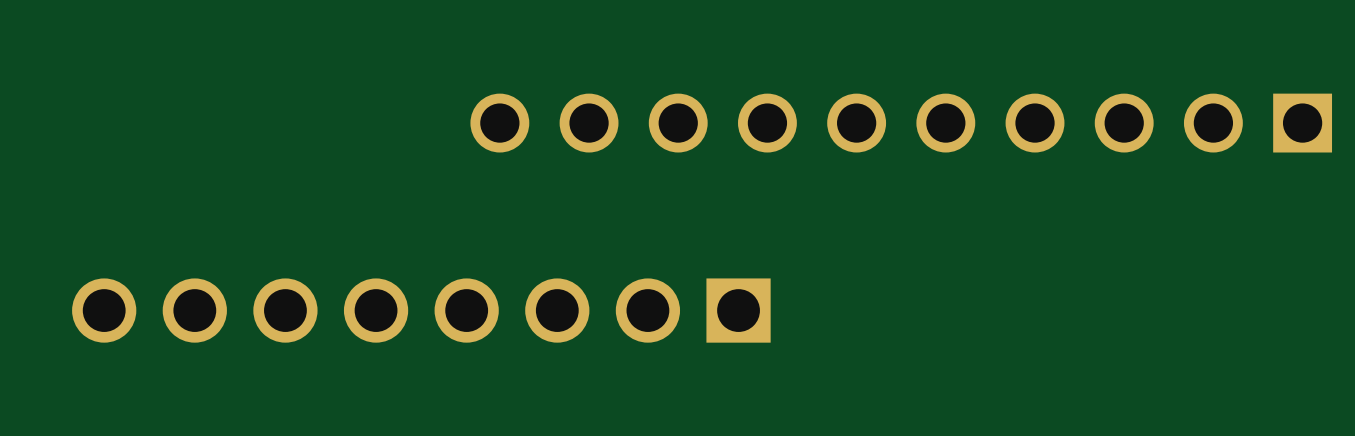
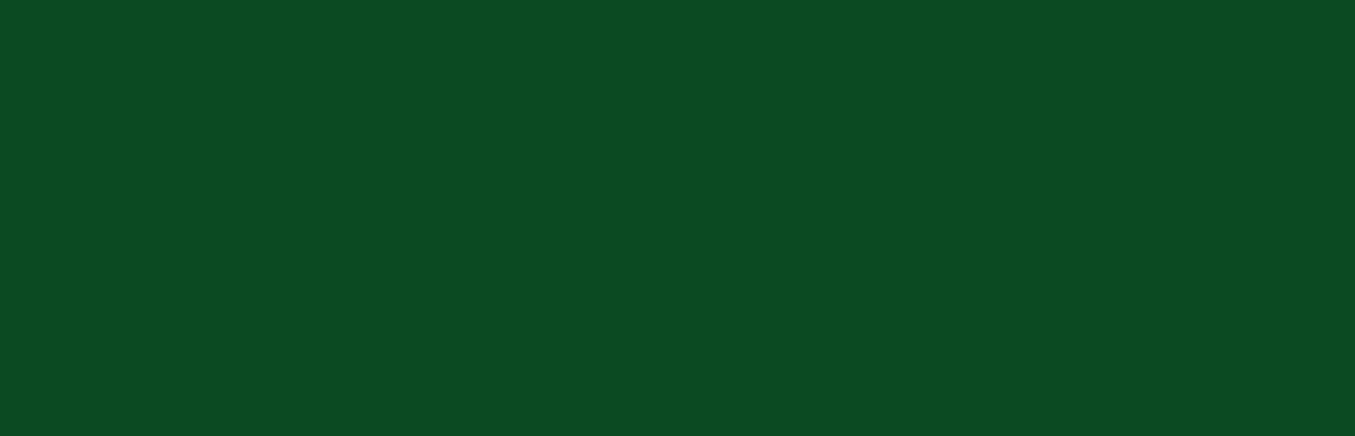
part: (901, 123) -> none
part: (421, 310) -> none

